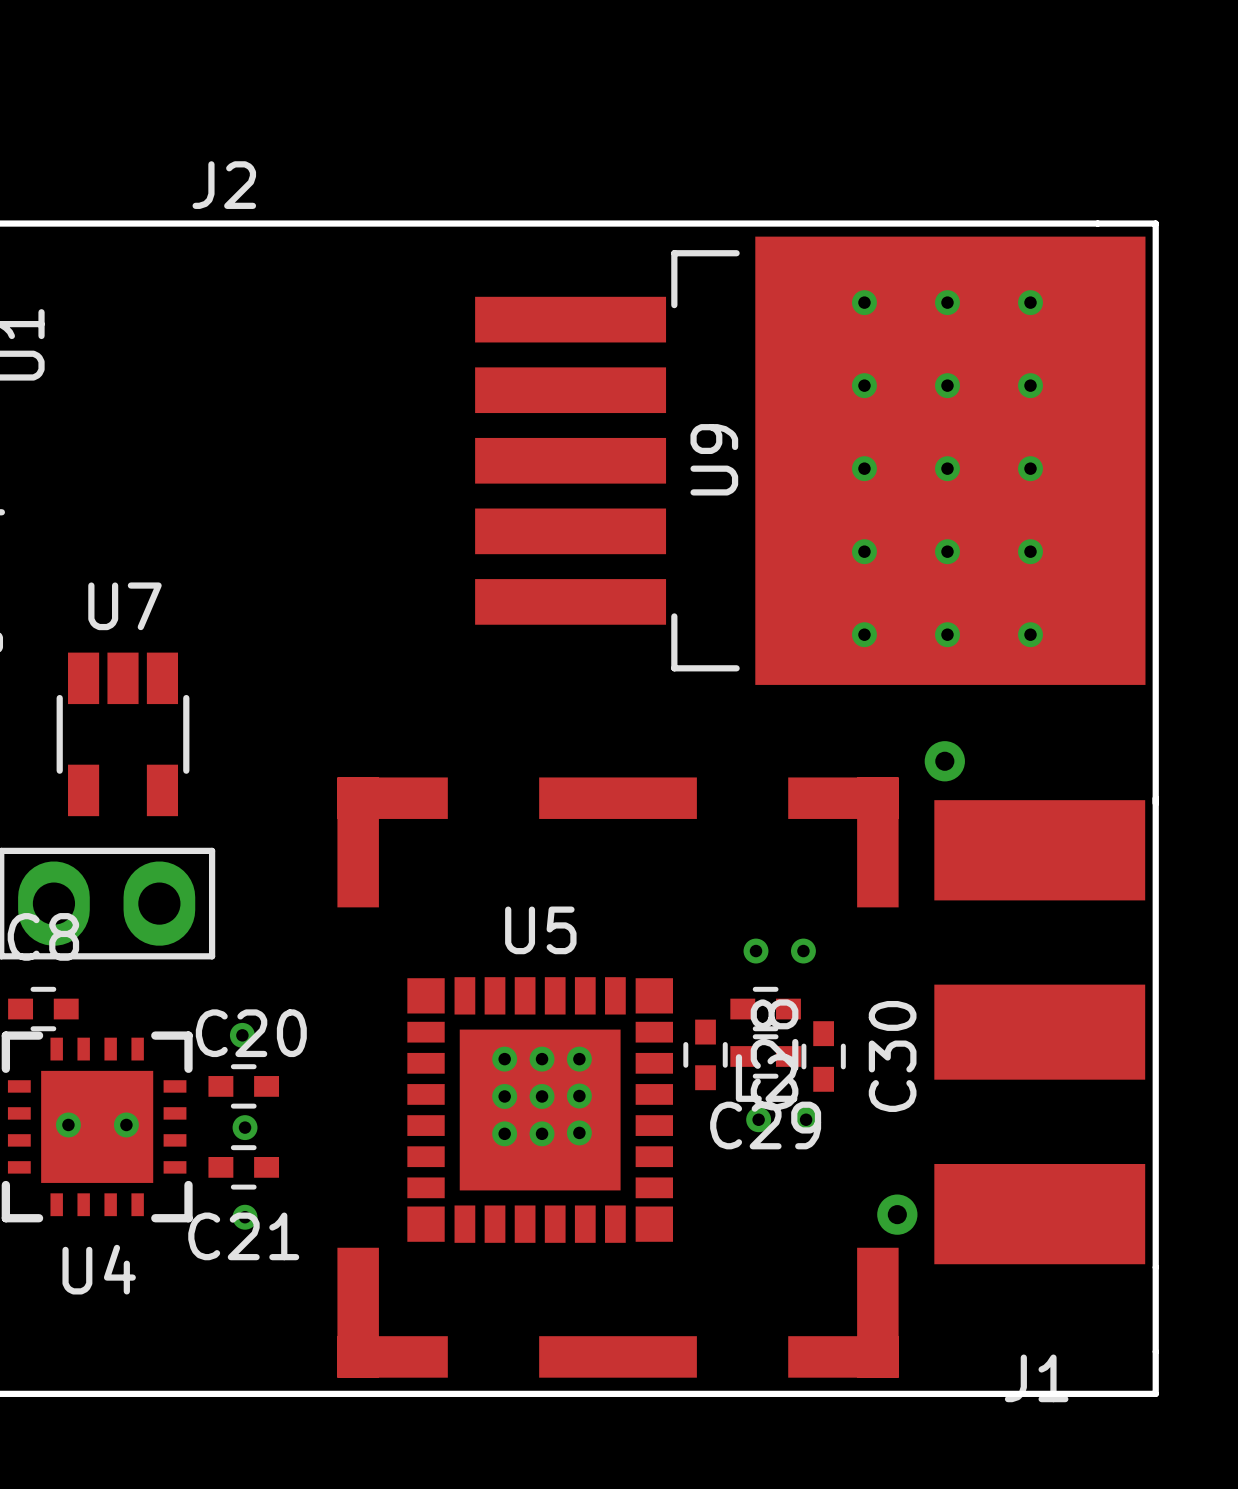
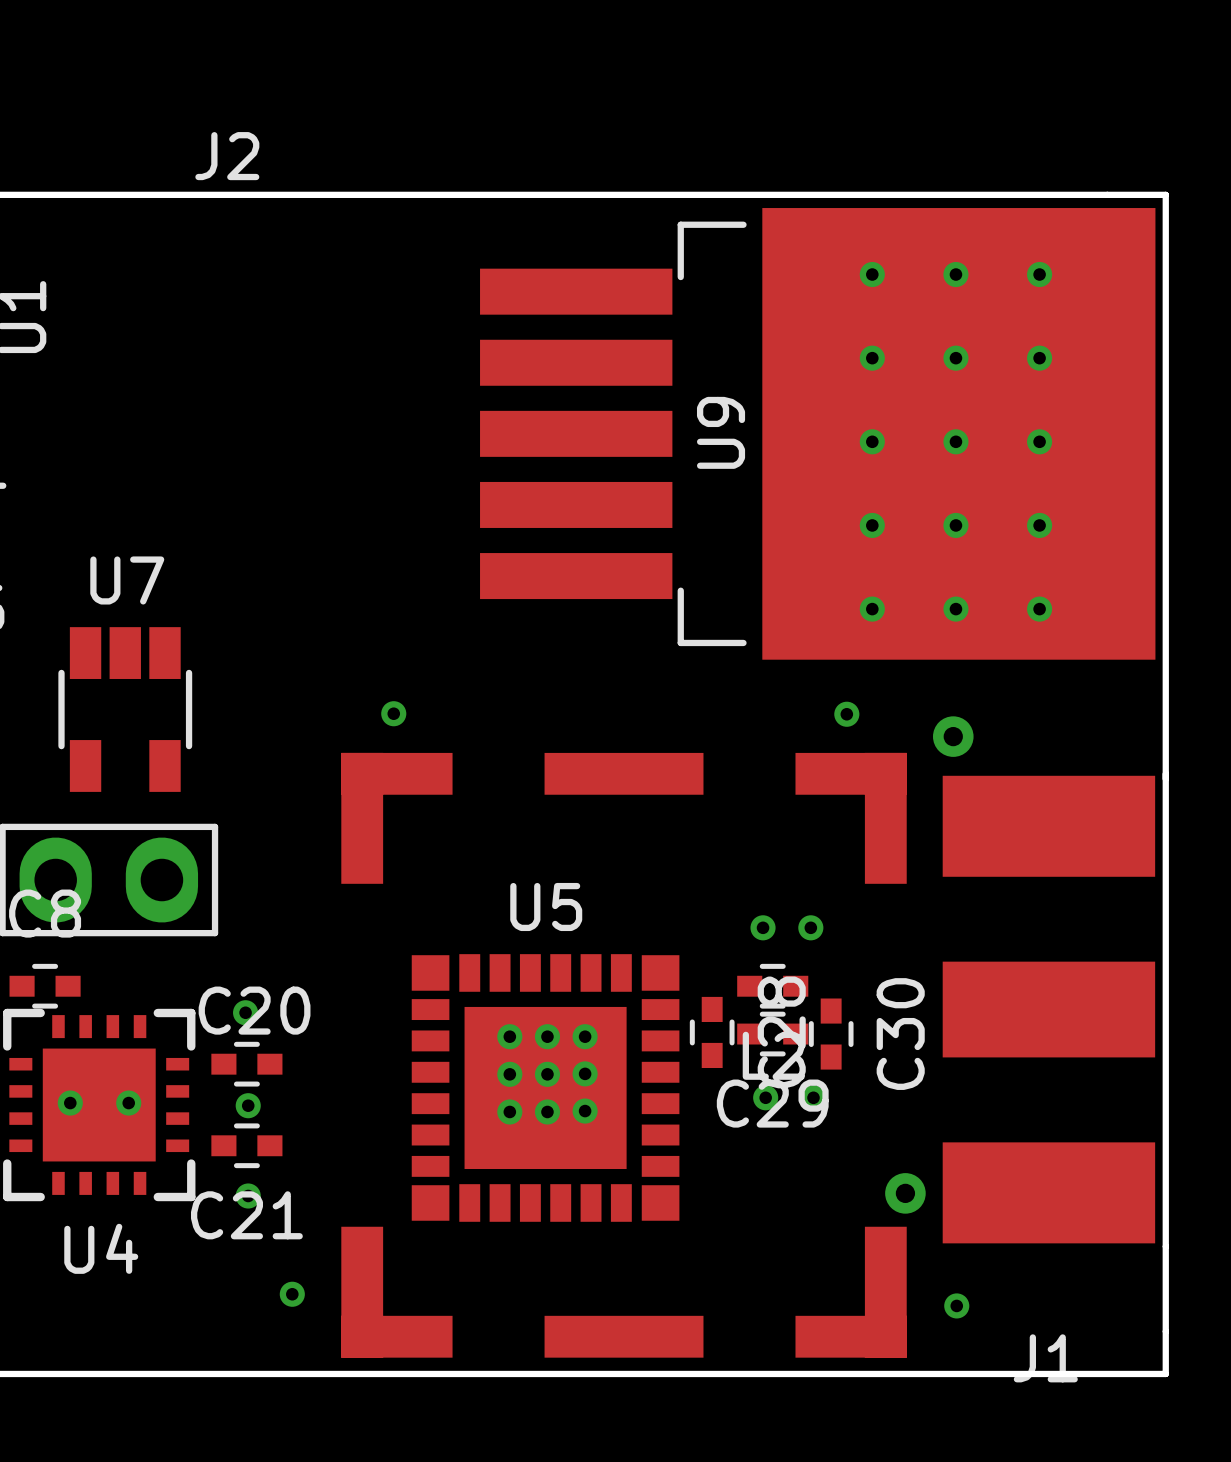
part: none -> (393, 713)
part: none -> (846, 714)
part: none -> (292, 1294)
part: none -> (956, 1305)

